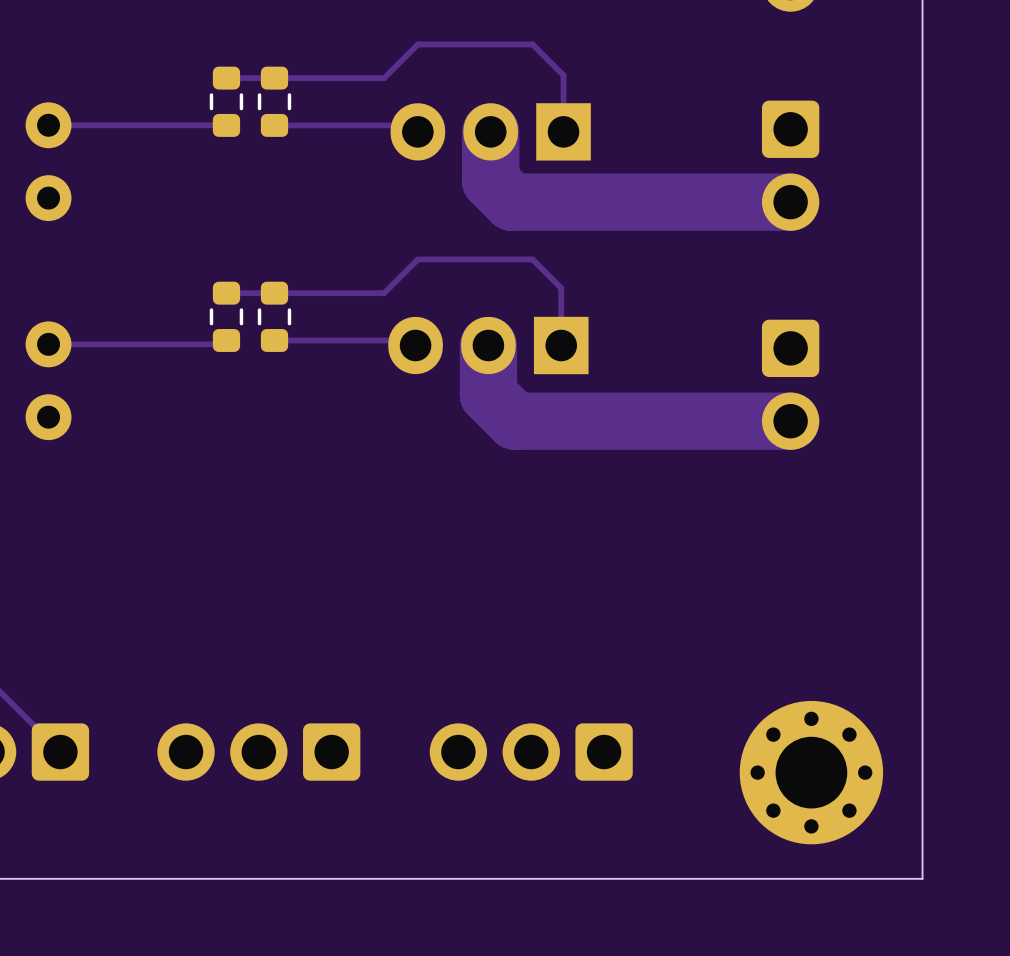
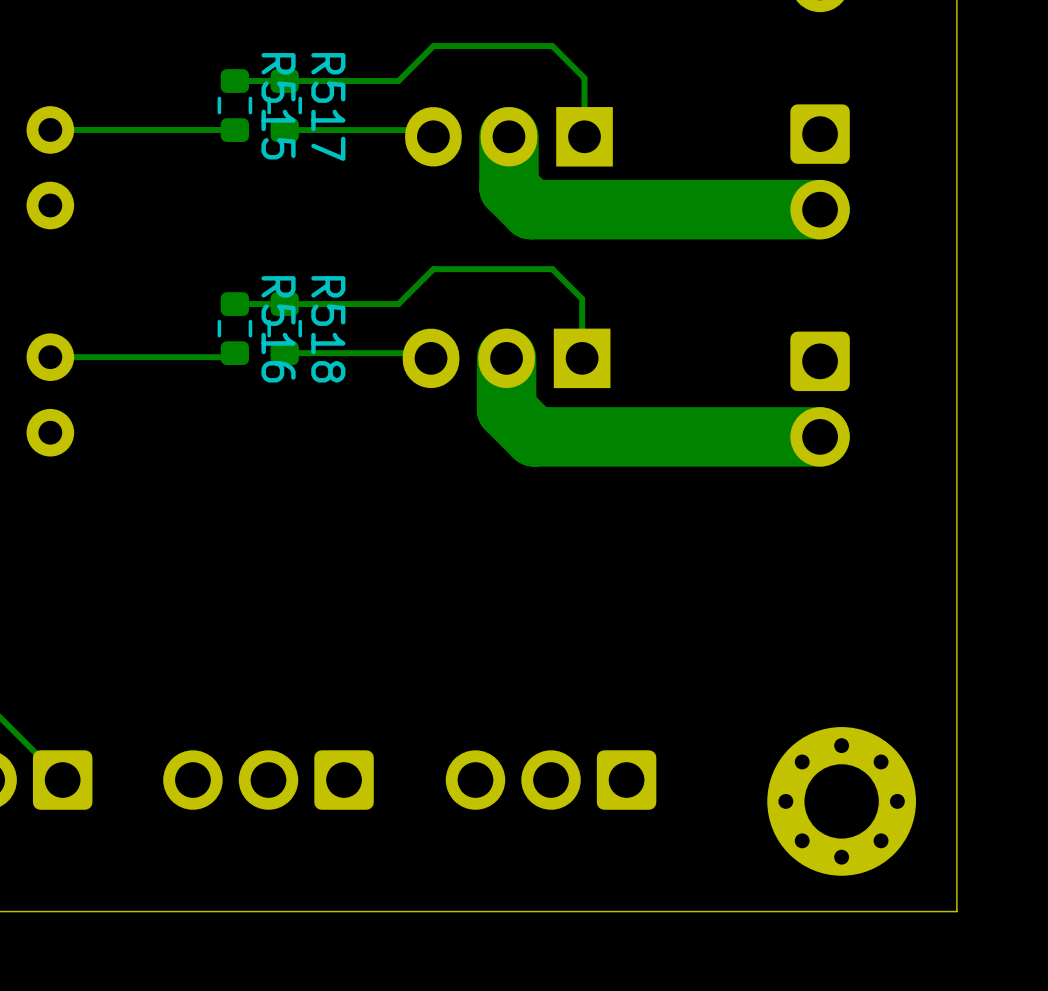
R515 name: none -> R515 (278, 106)
R517 name: none -> R517 (328, 106)
R516 name: none -> R516 (278, 329)
R518 name: none -> R518 (328, 329)

